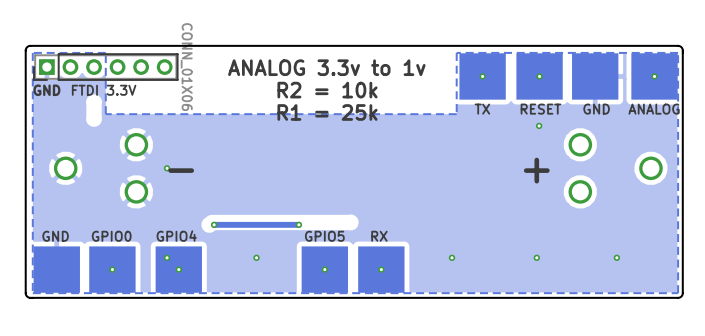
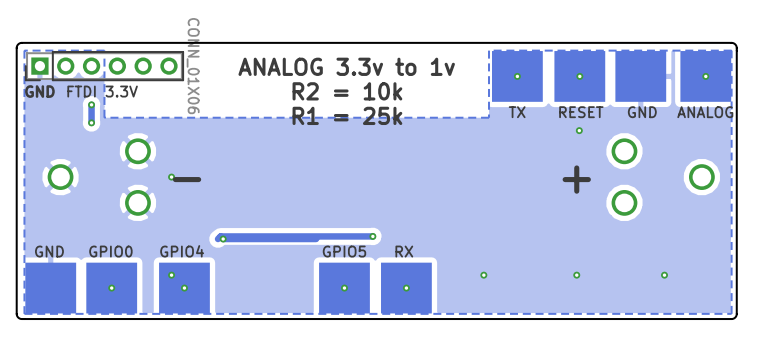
track: none -> (91, 104) (91, 122)
via: none -> (91, 104)
via: none -> (91, 122)
track: none -> (372, 236) (220, 236) (218, 239)
via: none -> (372, 236)
via: (298, 224) -> none
via: (256, 257) -> none

